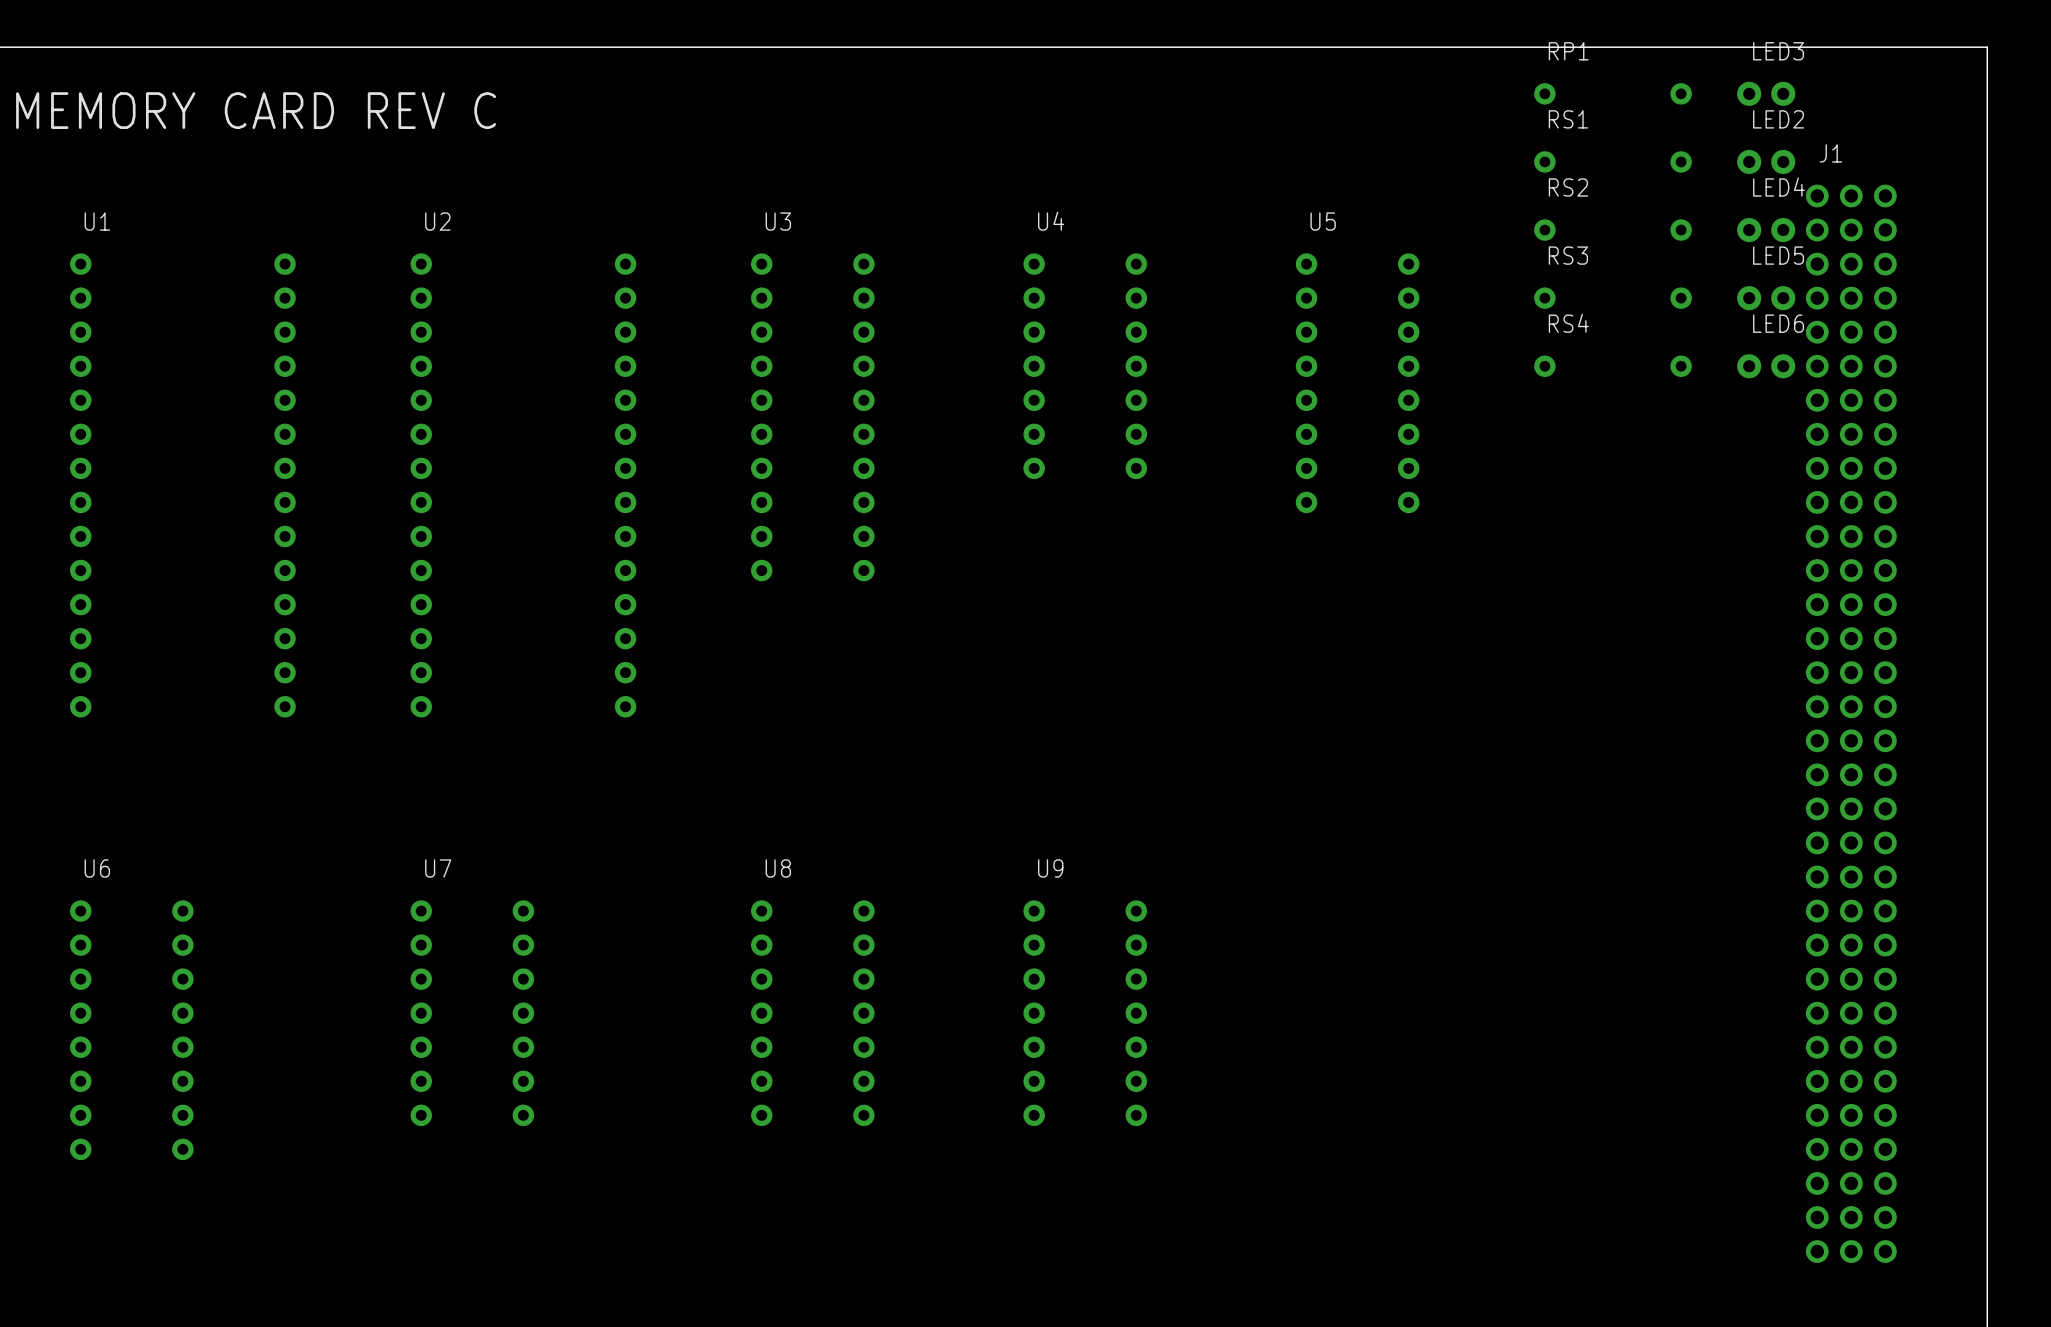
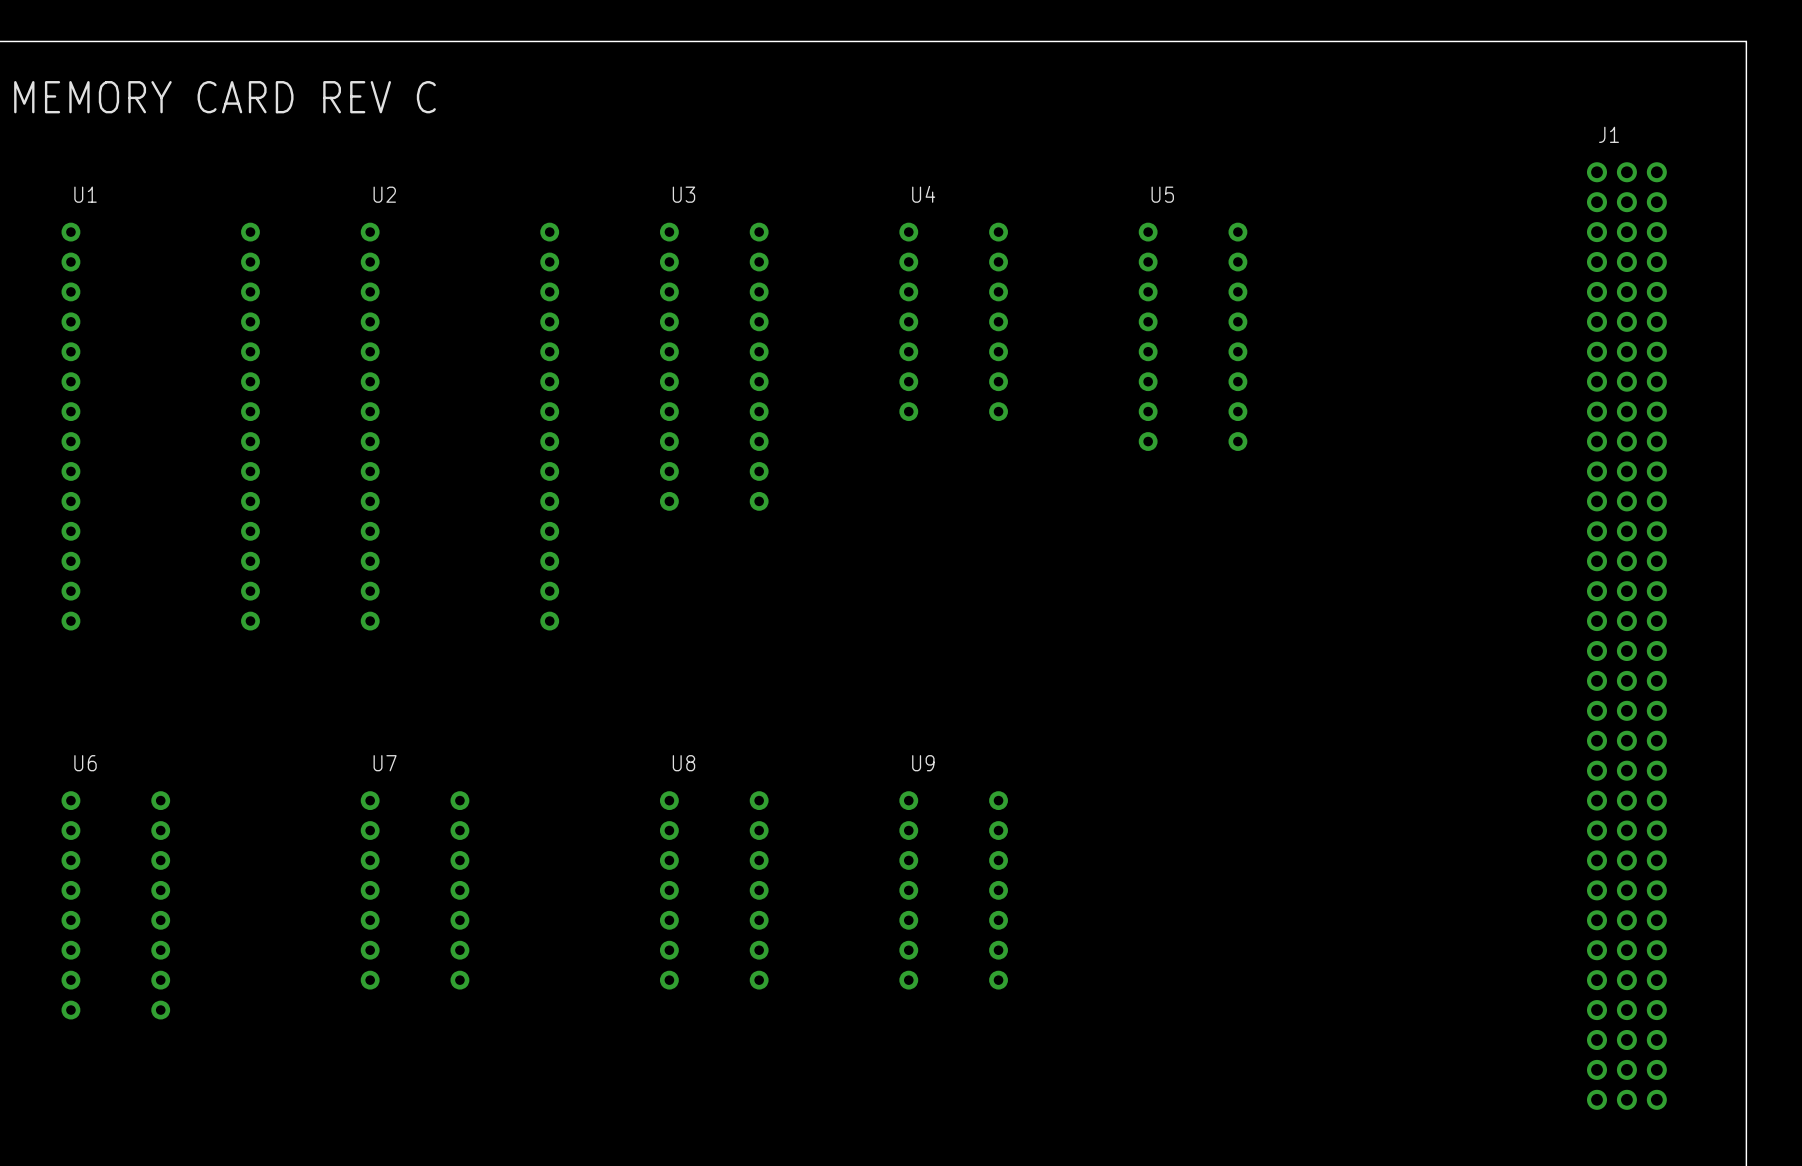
RP1: (1612, 93) -> none
LED3: (1766, 93) -> none
RS1: (1612, 161) -> none
LED2: (1766, 161) -> none
RS2: (1612, 230) -> none
LED4: (1766, 230) -> none
RS3: (1612, 298) -> none
LED5: (1766, 298) -> none
RS4: (1612, 366) -> none
LED6: (1766, 366) -> none

